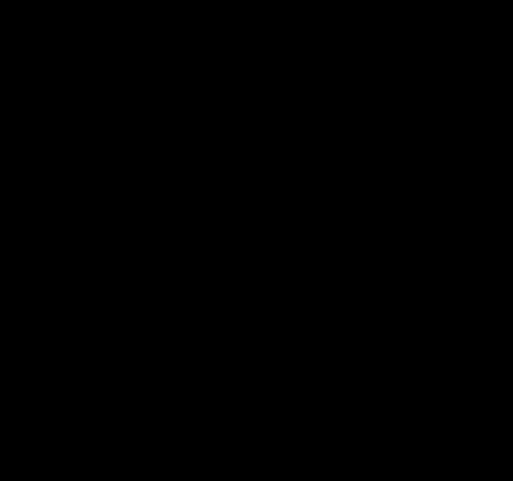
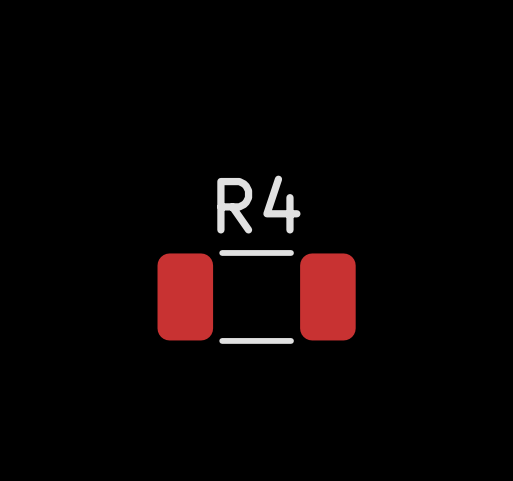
R4: none -> (256, 296)

